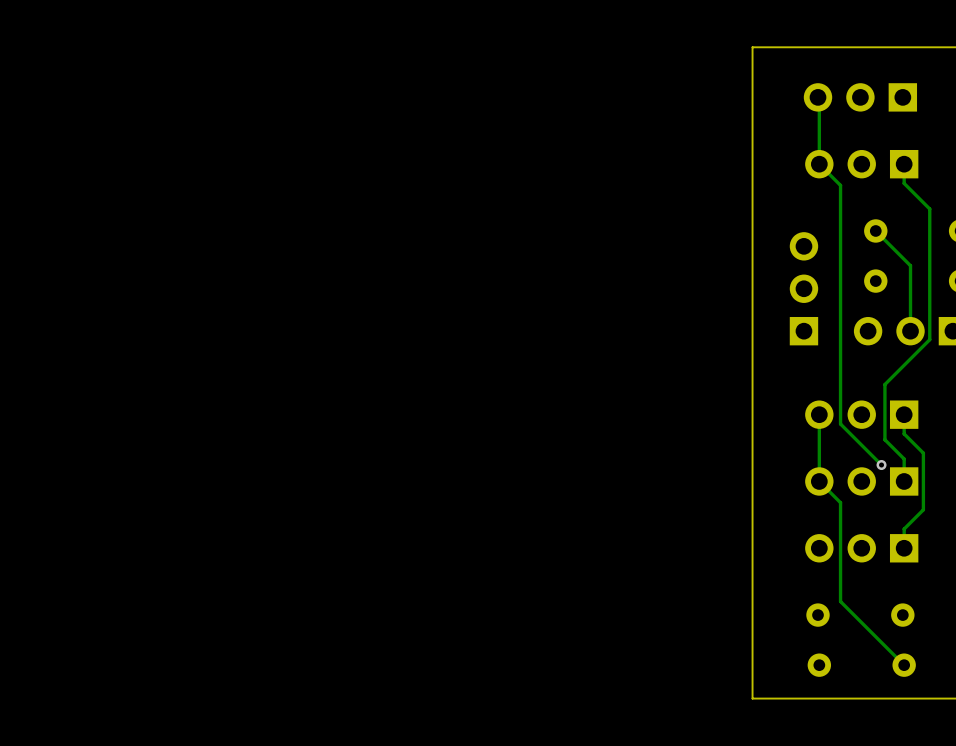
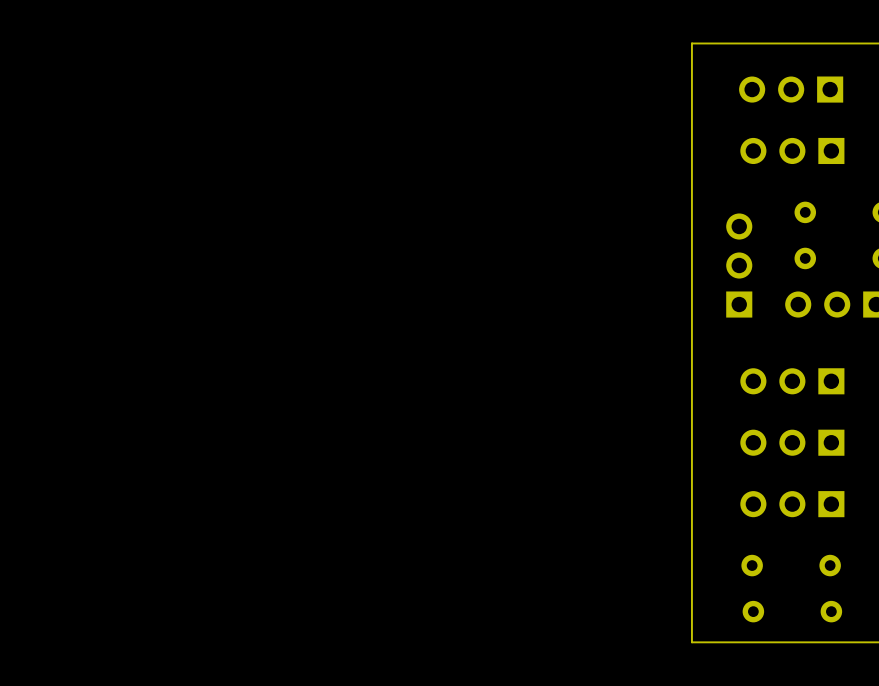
track: (818, 97) (819, 164) (840, 185) (840, 424) (881, 465) (881, 468) -> none
track: (904, 164) (904, 183) (929, 209) (929, 339) (884, 384) (884, 439) (904, 459) (904, 481) -> none
track: (875, 230) (910, 265) (910, 331) -> none
track: (819, 414) (819, 481) (840, 502) (840, 601) (904, 665) -> none
track: (904, 414) (904, 433) (923, 453) (923, 509) (904, 529) (904, 548) -> none
via: (881, 465) -> none

